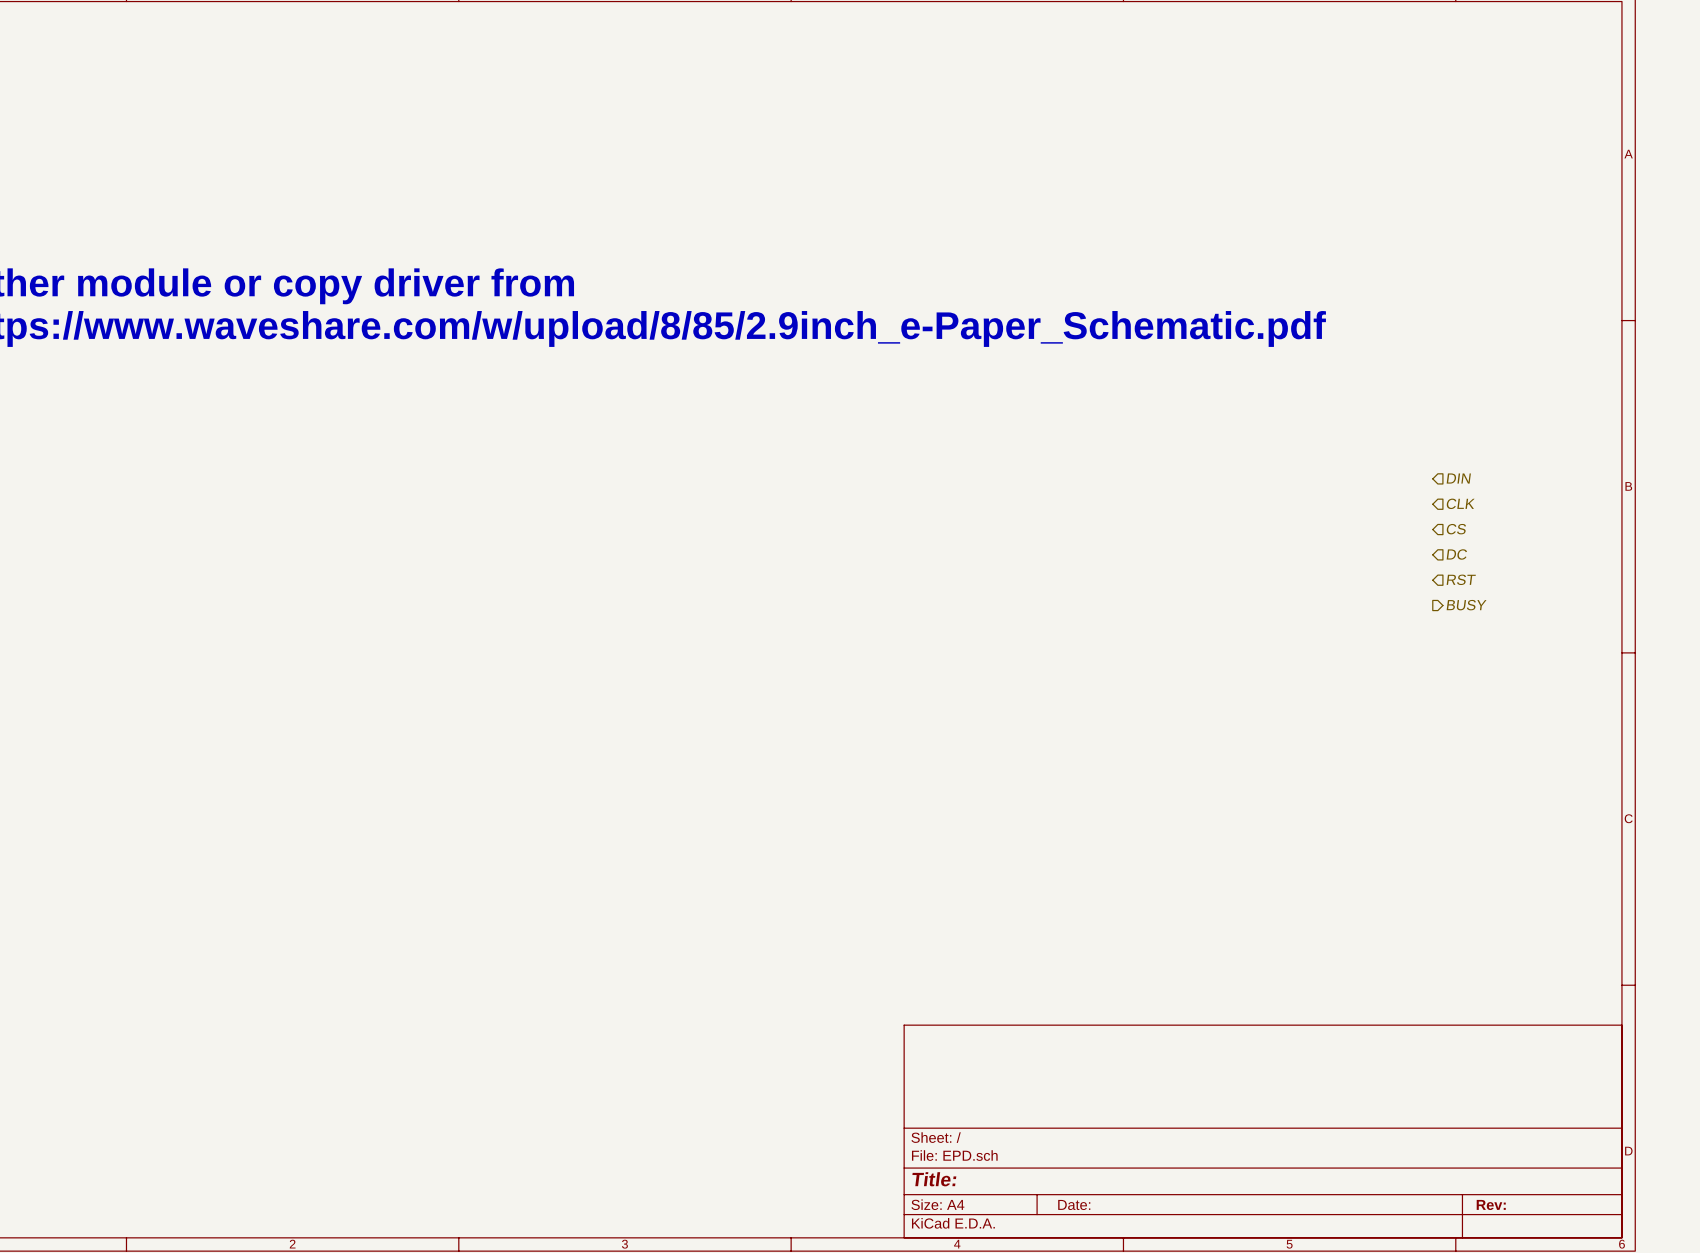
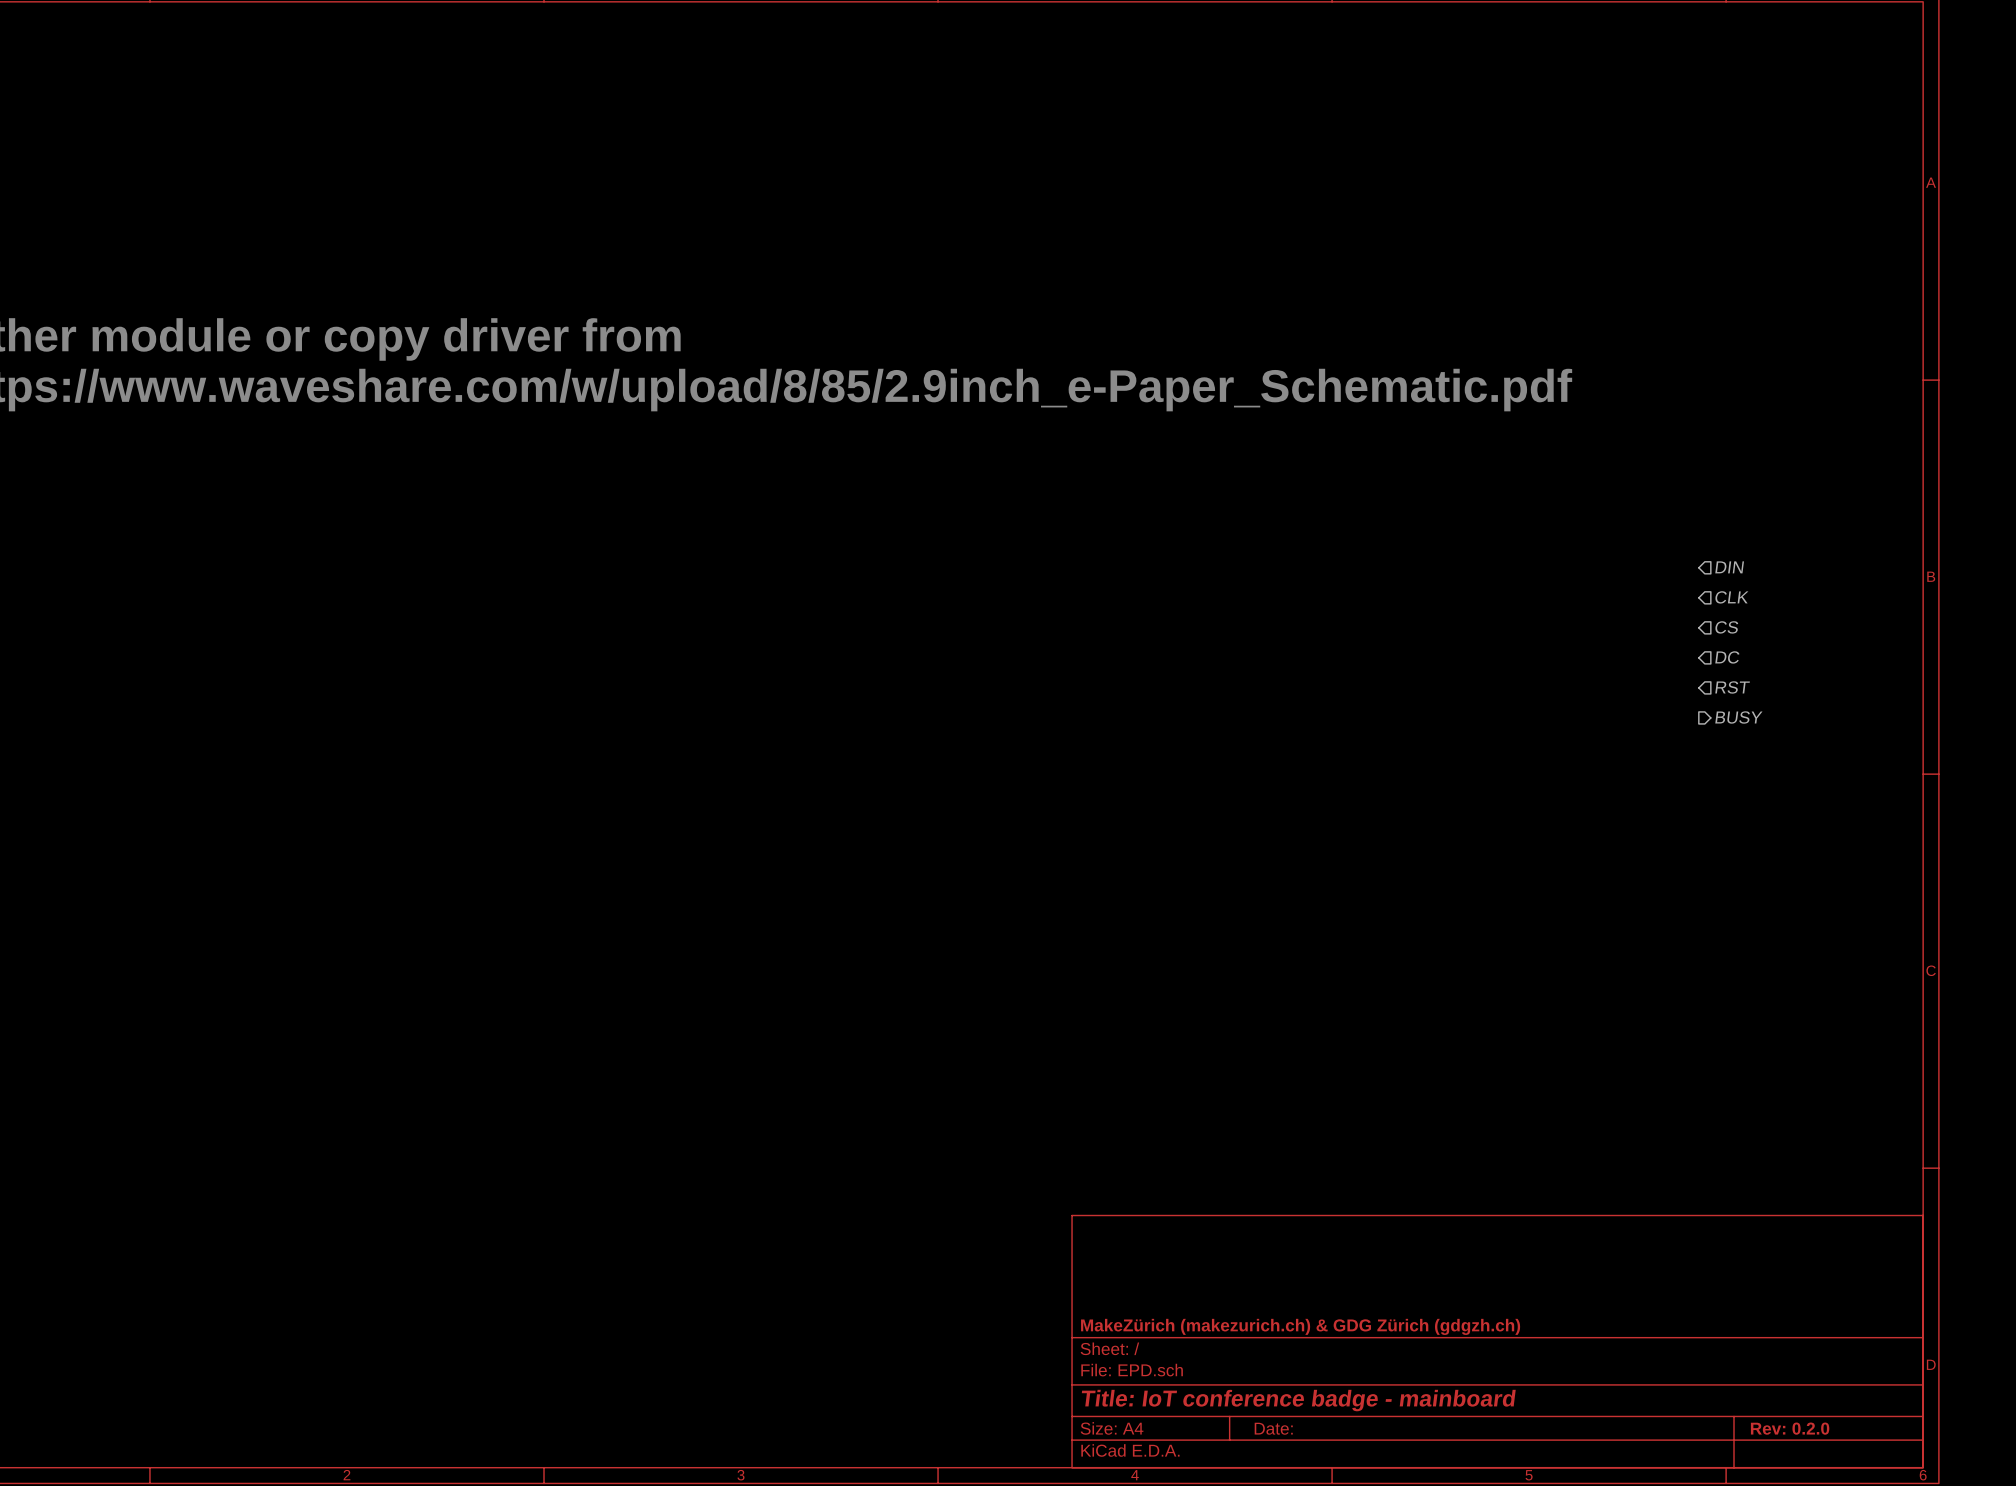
title block: none -> MakeZürich (makezurich.ch) & GDG Zürich (gdgzh.ch) (1300, 1326)
title block: Title: (934, 1179) -> Title: IoT conference badge - mainboard (1298, 1400)
title block: Rev: (1491, 1204) -> Rev: 0.2.0 (1790, 1428)

